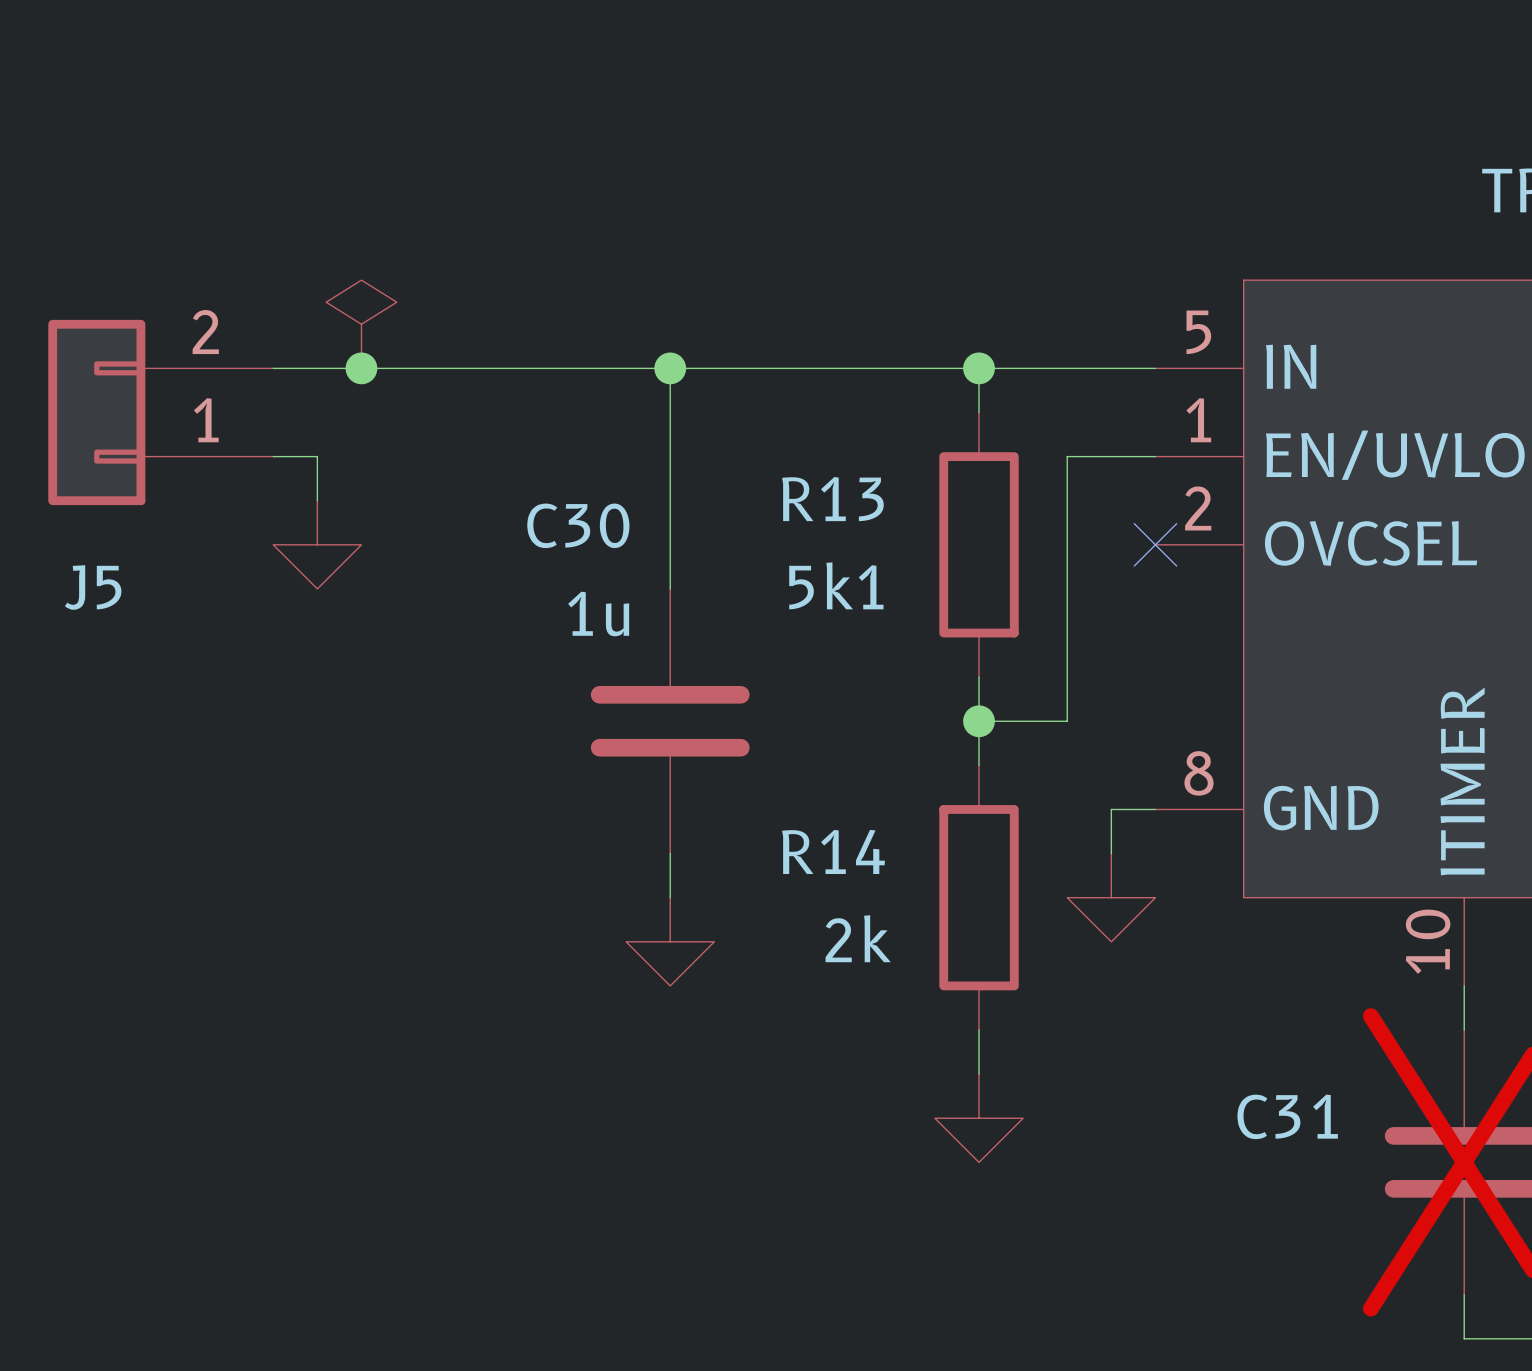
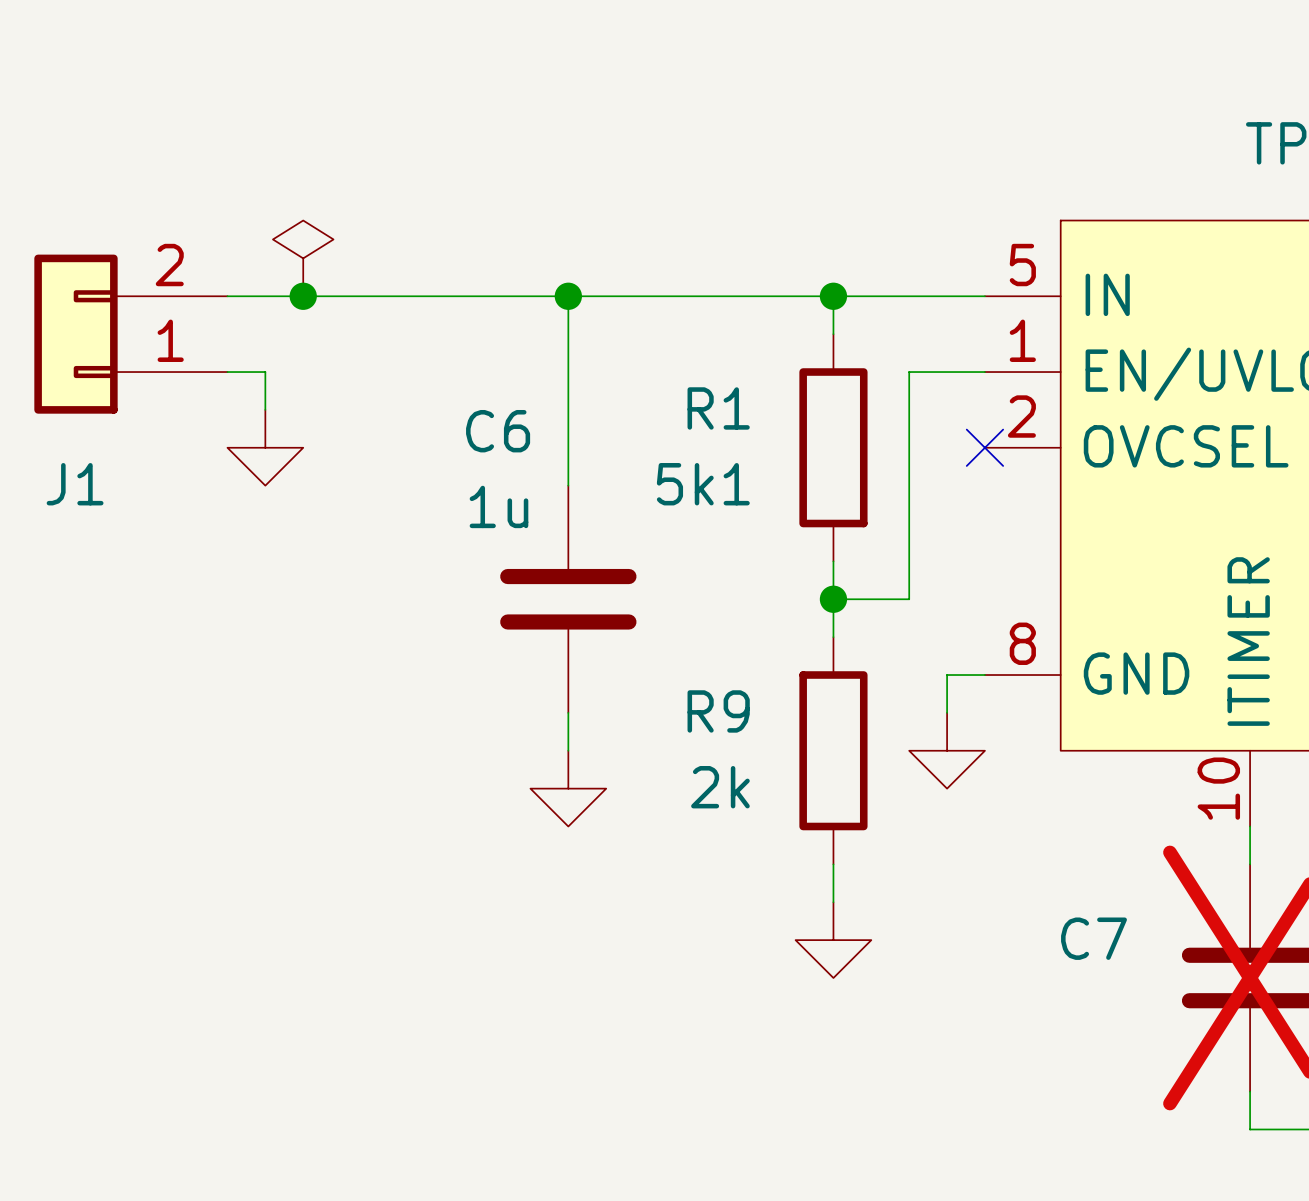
R13 name: R13 (832, 499) -> R1 (718, 408)
C30 name: C30 (578, 525) -> C6 (498, 431)
J5 name: J5 (93, 587) -> J1 (75, 484)
R14 name: R14 (833, 851) -> R9 (718, 711)
C31 name: C31 (1287, 1116) -> C7 (1093, 938)

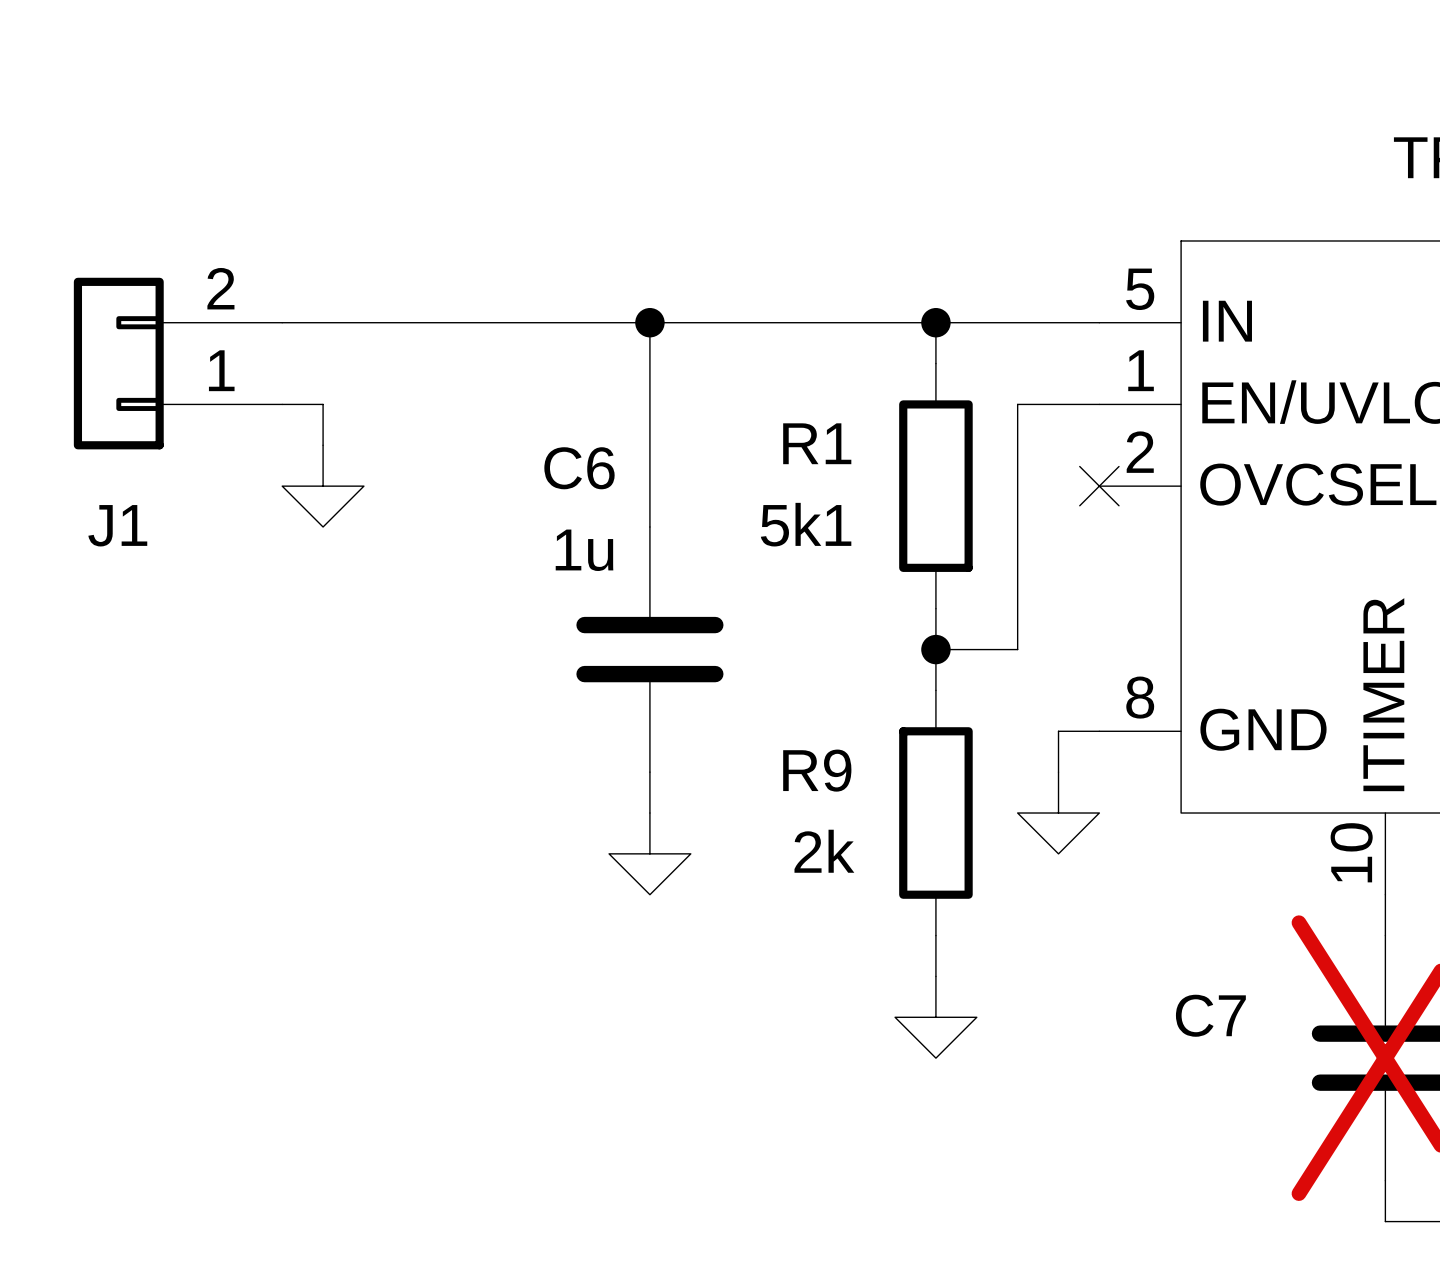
power symbol: (303, 258) -> none
junction: (303, 296) -> none

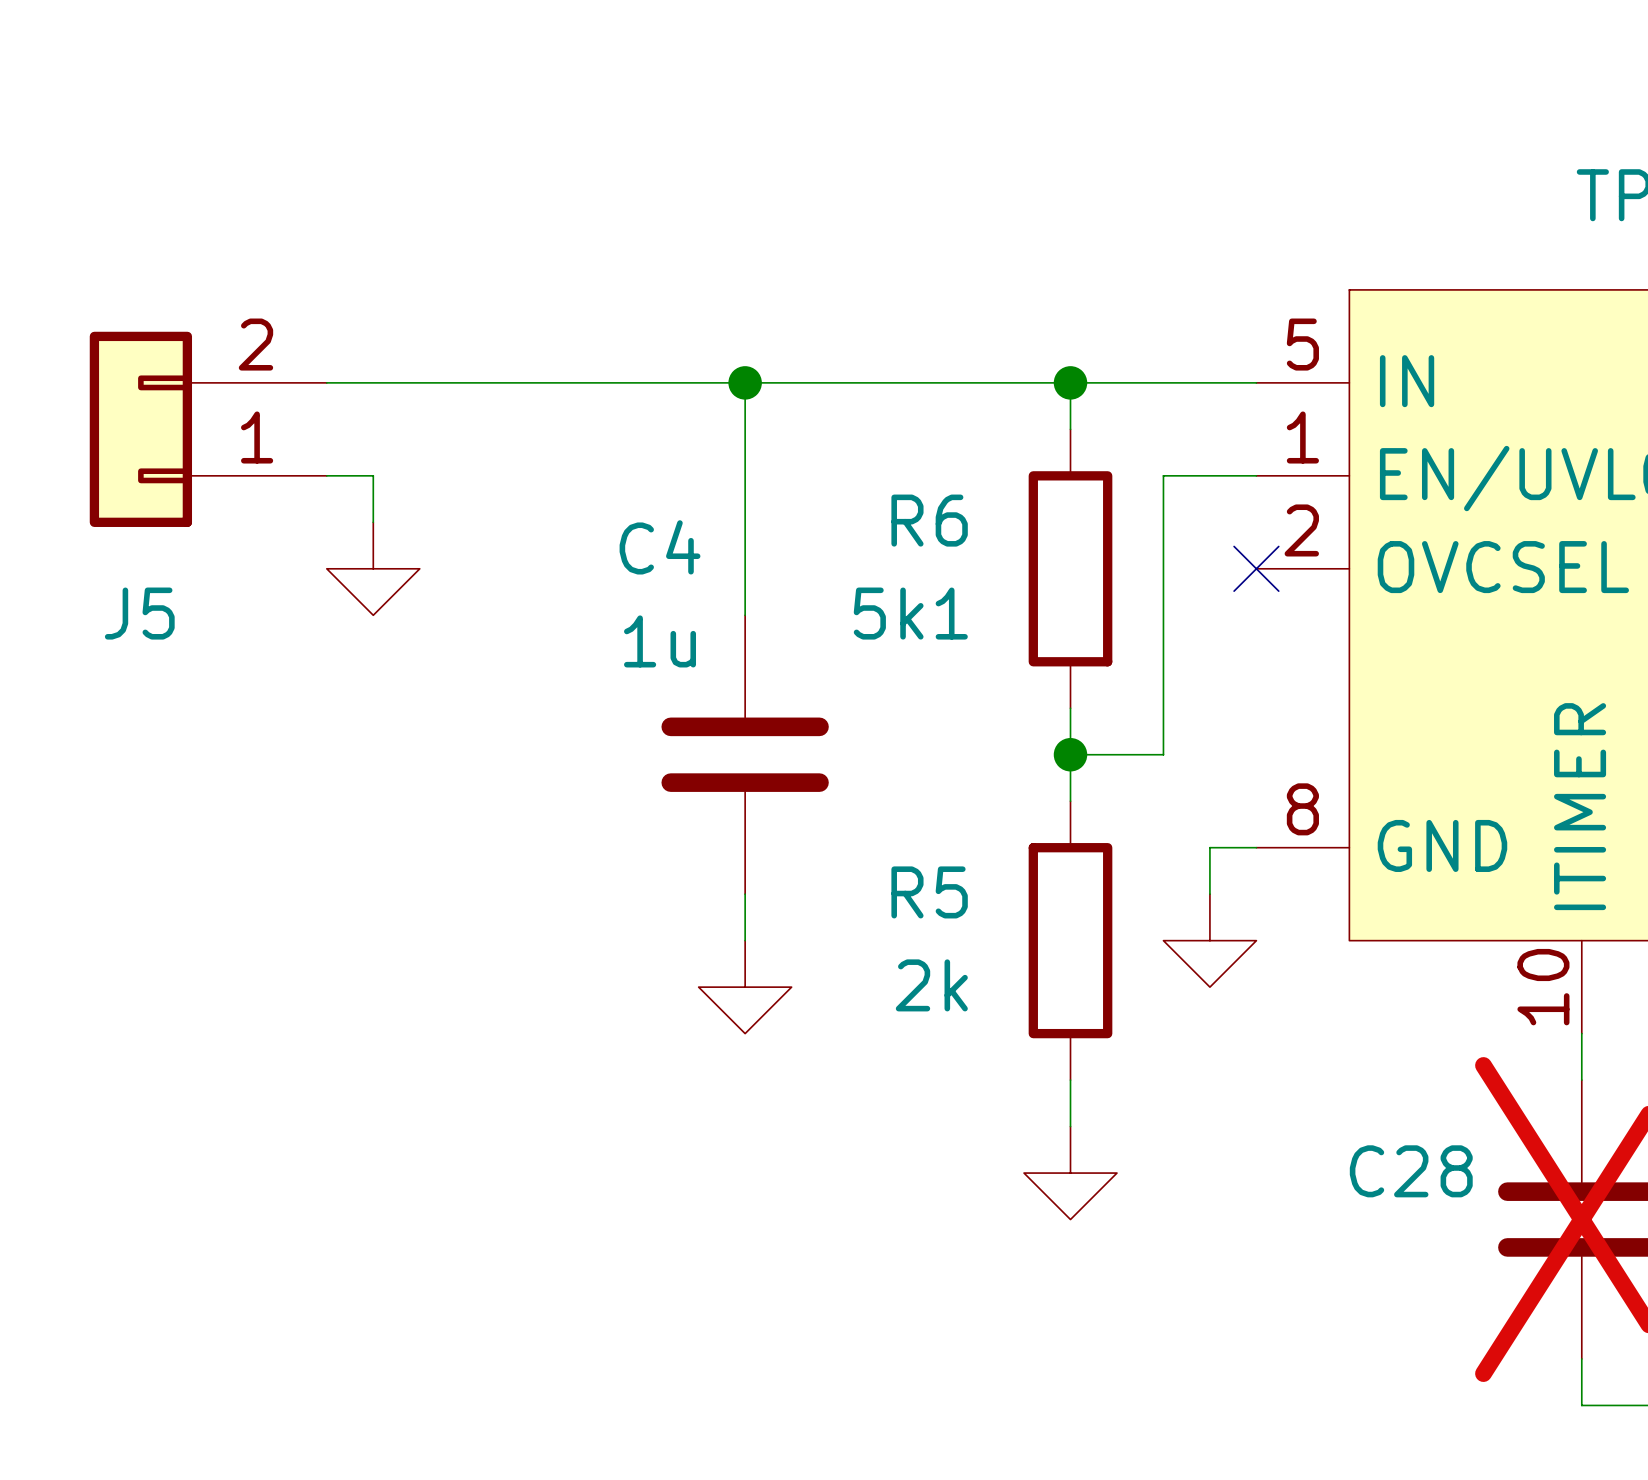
R1 name: R1 (817, 443) -> R6 (929, 520)
C6 name: C6 (579, 468) -> C4 (660, 547)
J1 name: J1 (117, 525) -> J5 (139, 613)
R9 name: R9 (817, 770) -> R5 (929, 892)
C7 name: C7 (1210, 1015) -> C28 (1411, 1171)

